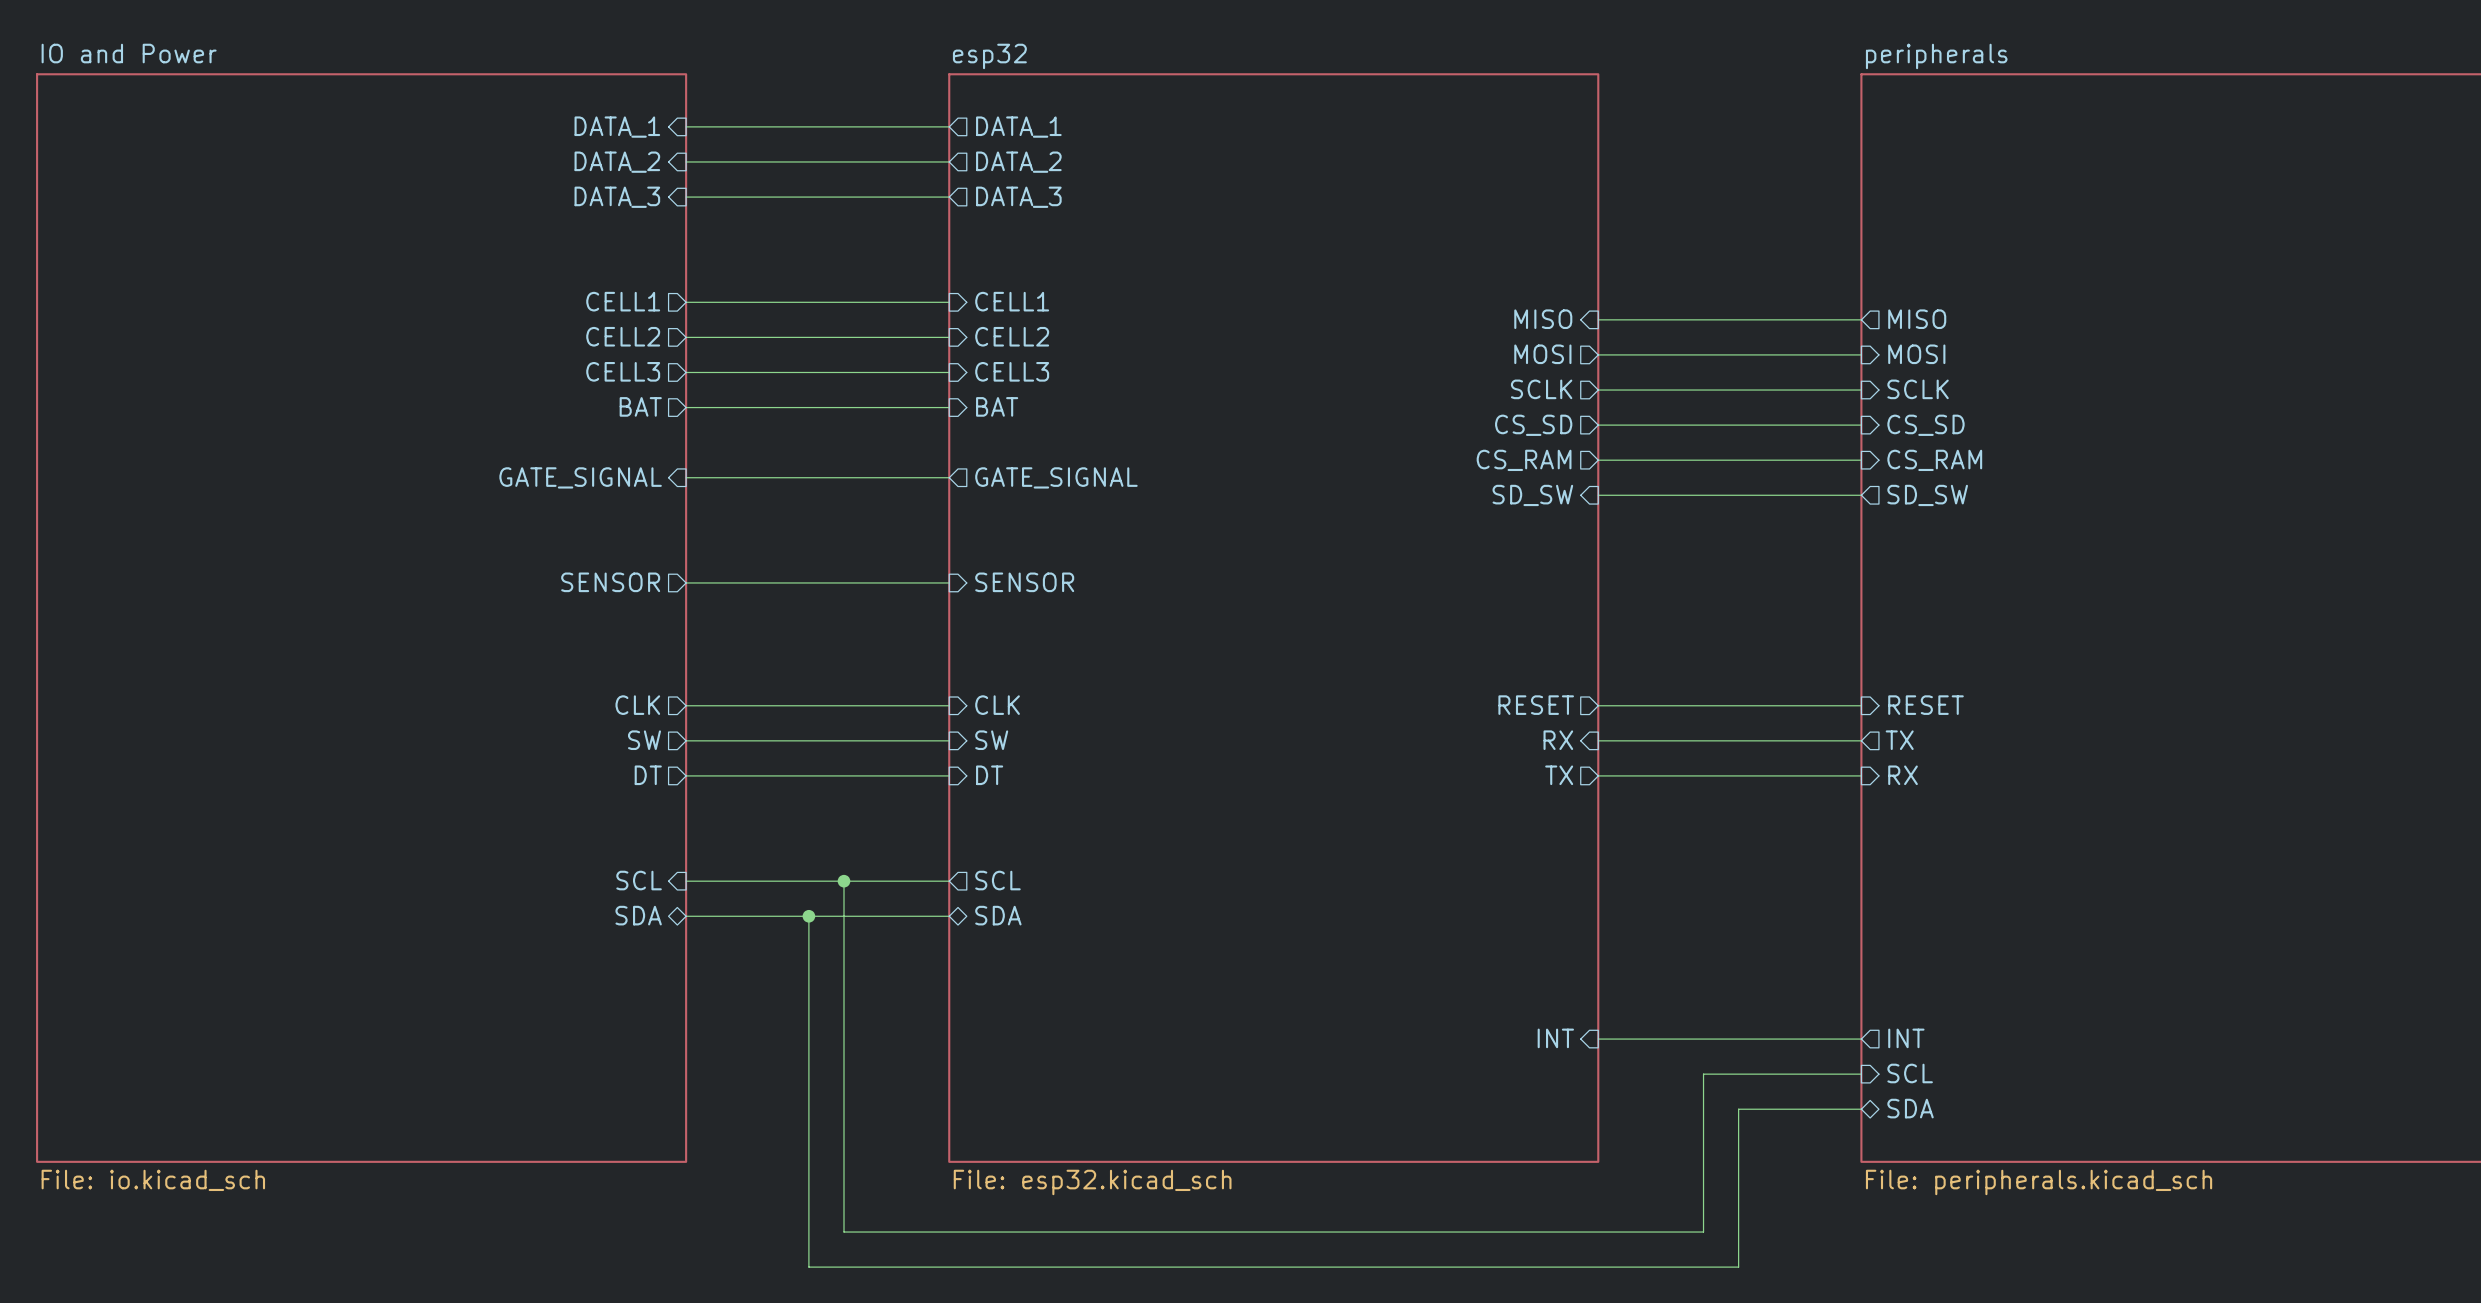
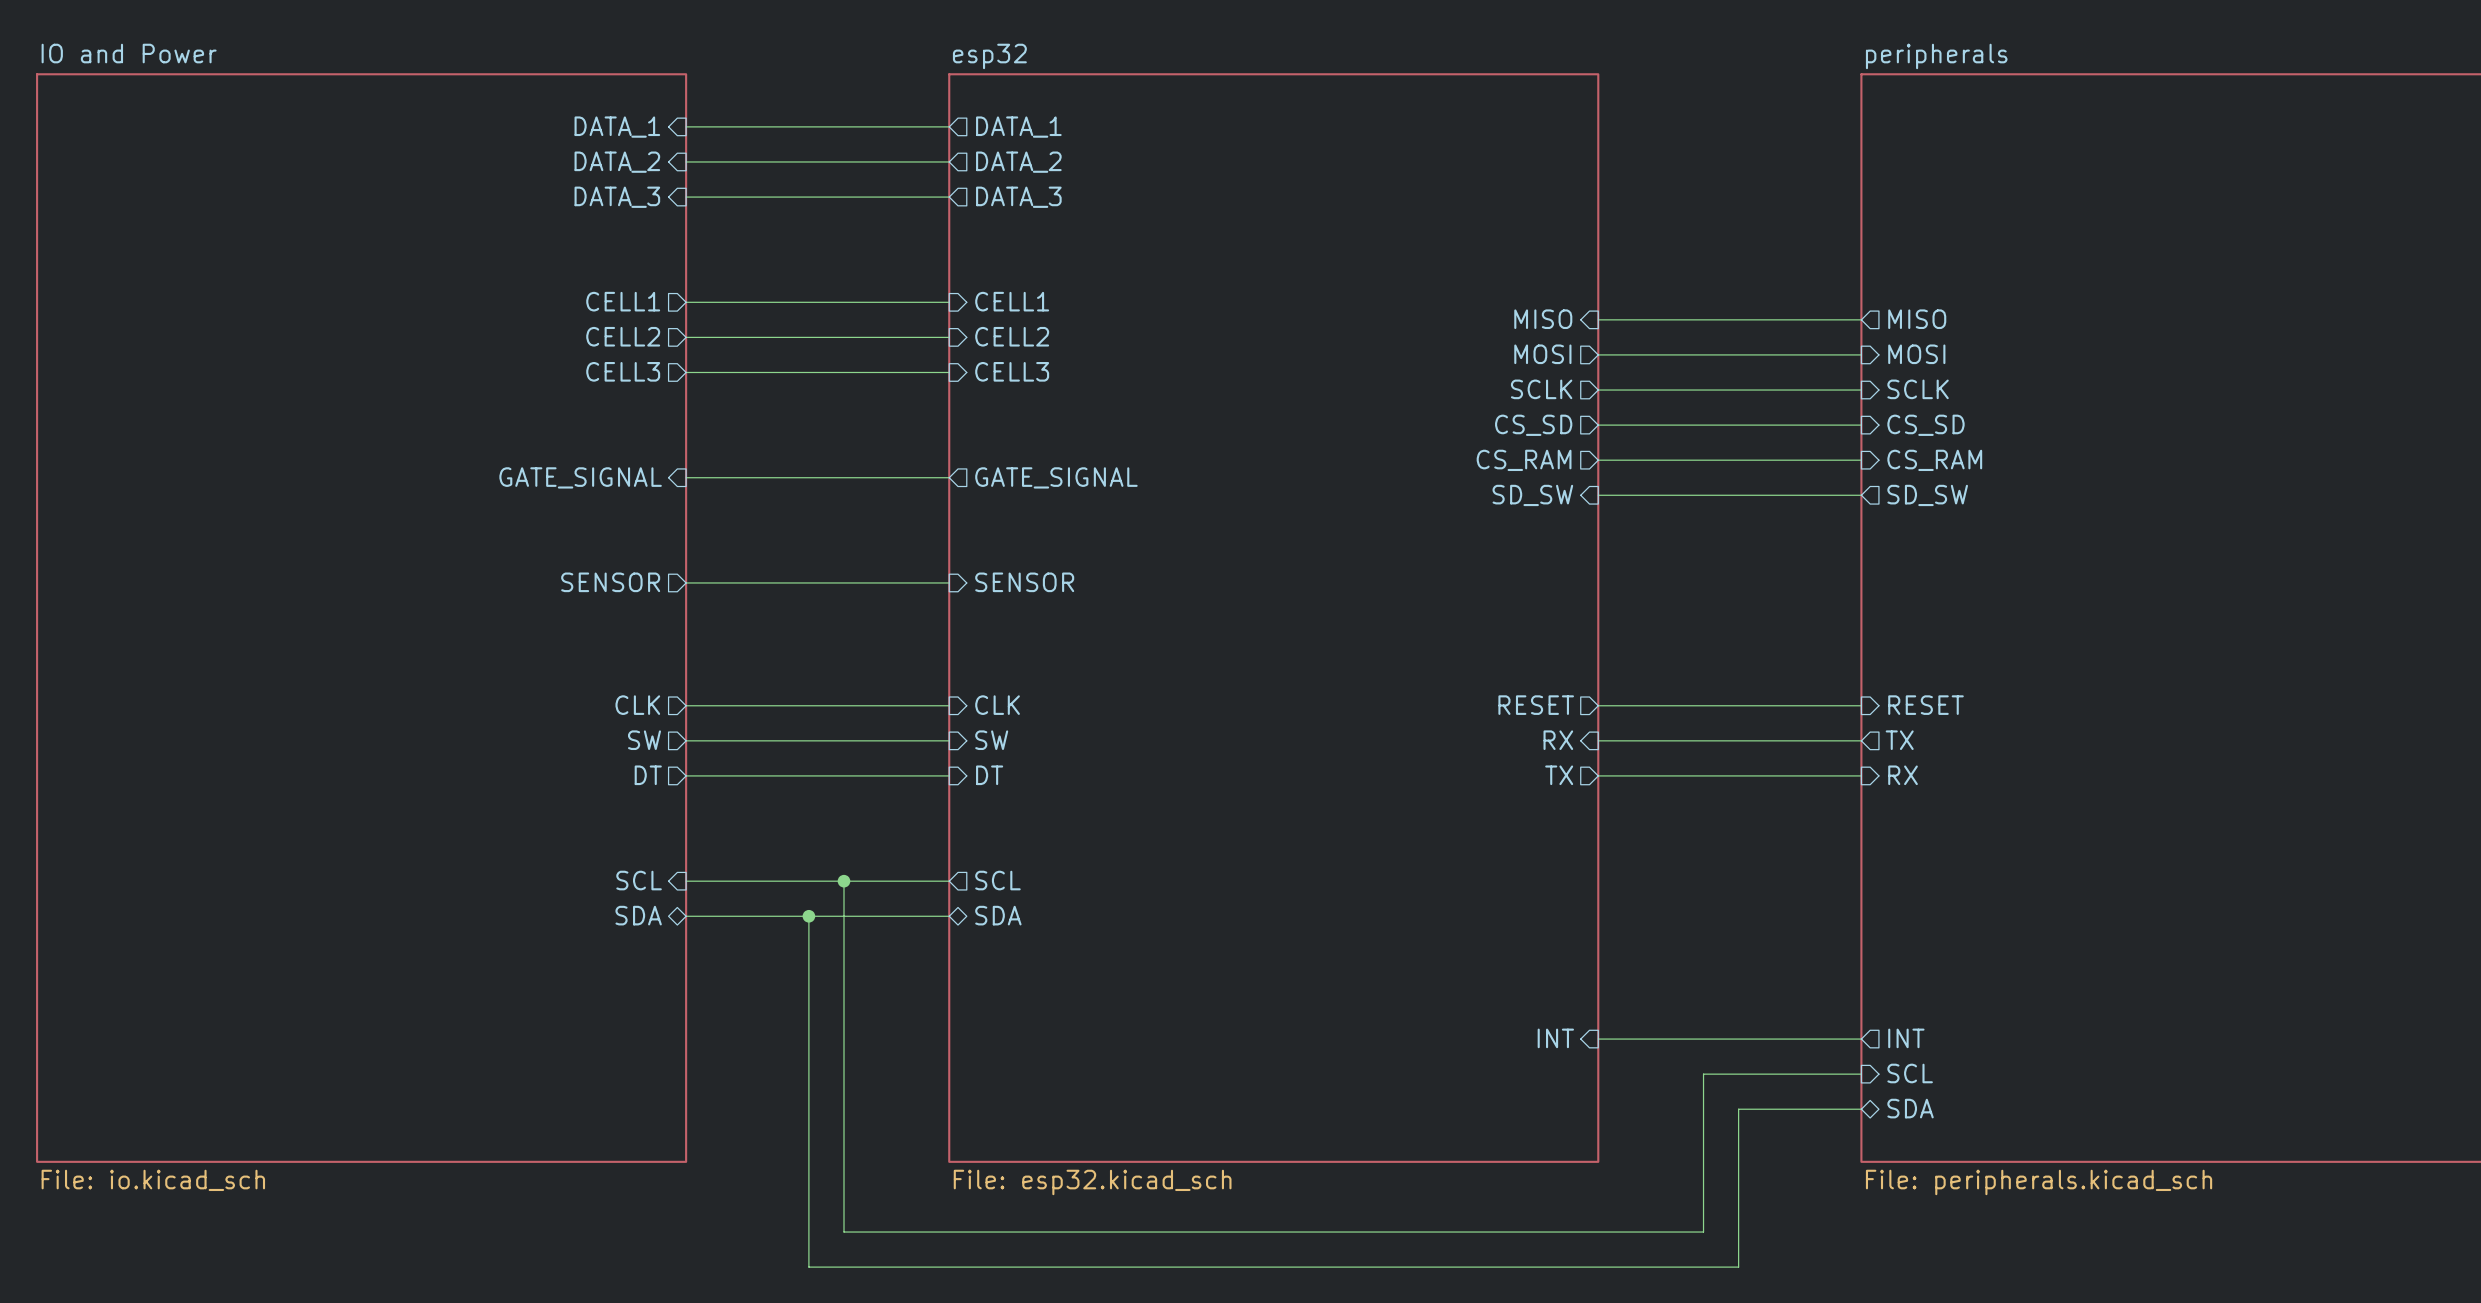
sheet pin: BAT (640, 406) -> none
sheet pin: BAT (997, 406) -> none
wire: (686, 407) (949, 407) -> none

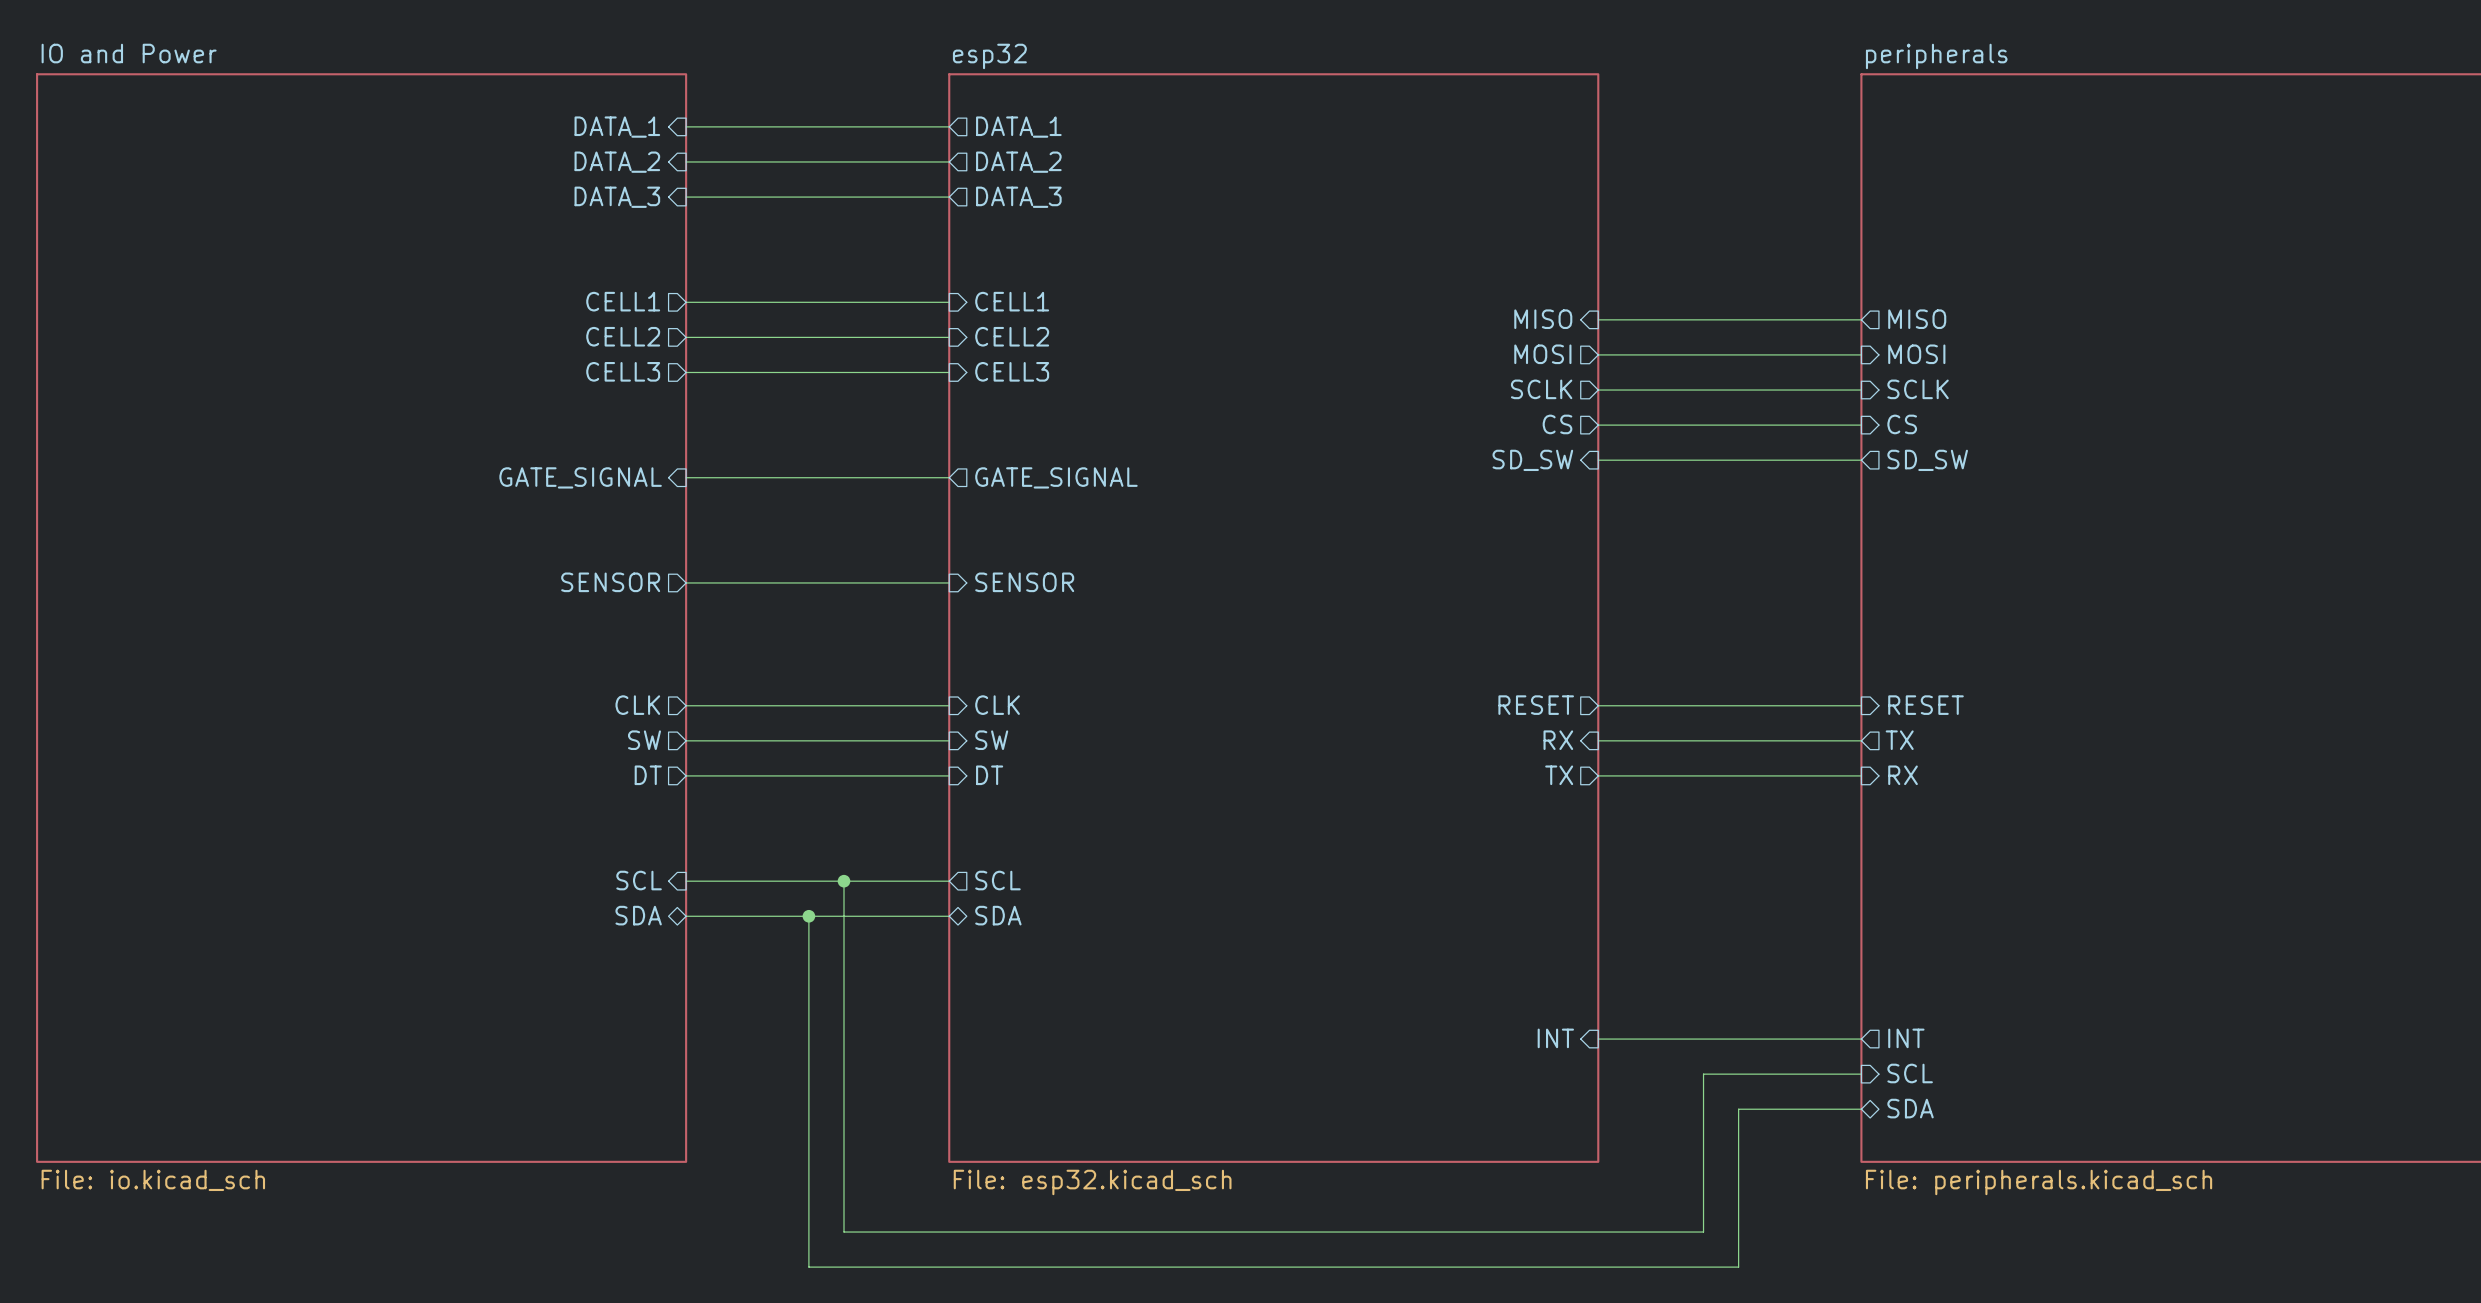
sheet pin: CS_SD (1533, 425) -> CS (1557, 424)
sheet pin: CS_SD (1926, 425) -> CS (1902, 424)
sheet pin shape: output (1524, 460) -> input (1532, 460)
sheet pin: CS_RAM (1524, 460) -> SD_SW (1532, 460)
sheet pin shape: input (1934, 460) -> output (1927, 460)
sheet pin: CS_RAM (1934, 460) -> SD_SW (1927, 460)
sheet pin: SD_SW (1532, 495) -> none
wire: (1598, 495) (1861, 495) -> none
sheet pin: SD_SW (1927, 495) -> none

